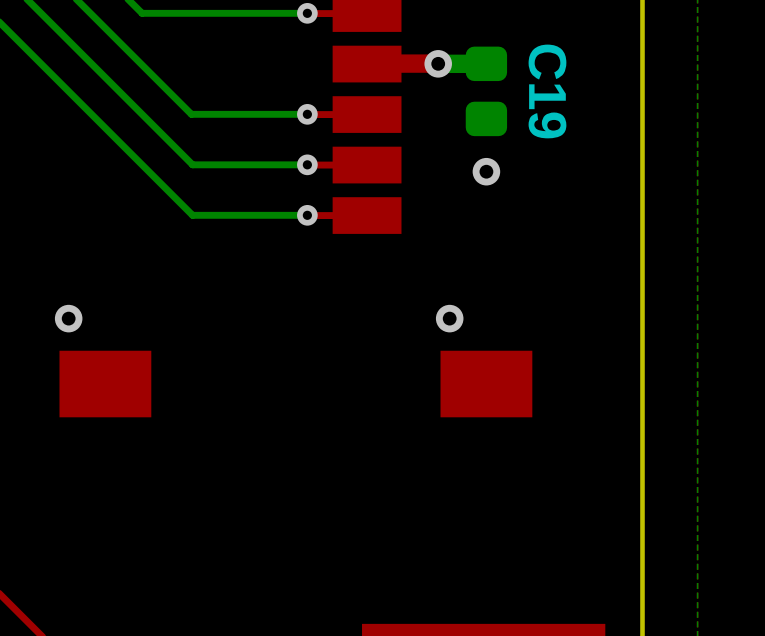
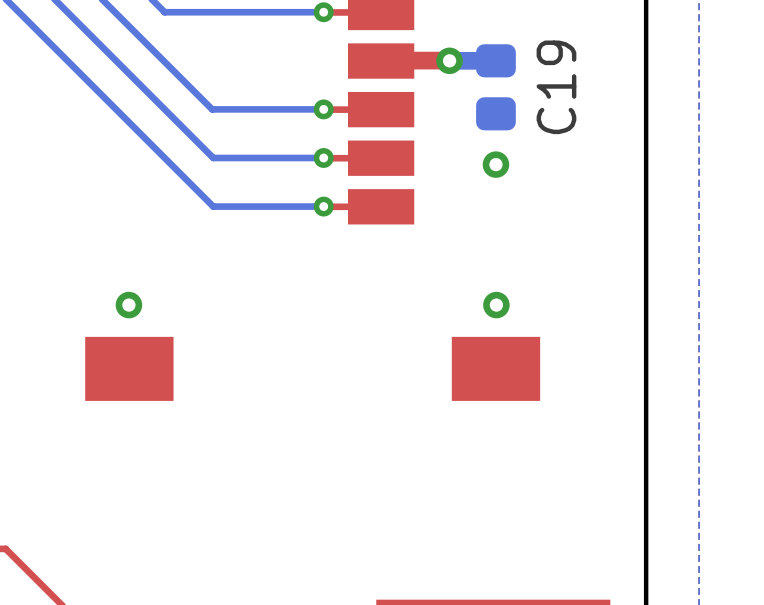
C19 name rotation: 0° (547, 91) -> 180° (556, 87)
via position: (68, 318) -> (128, 305)
via position: (449, 318) -> (496, 305)

